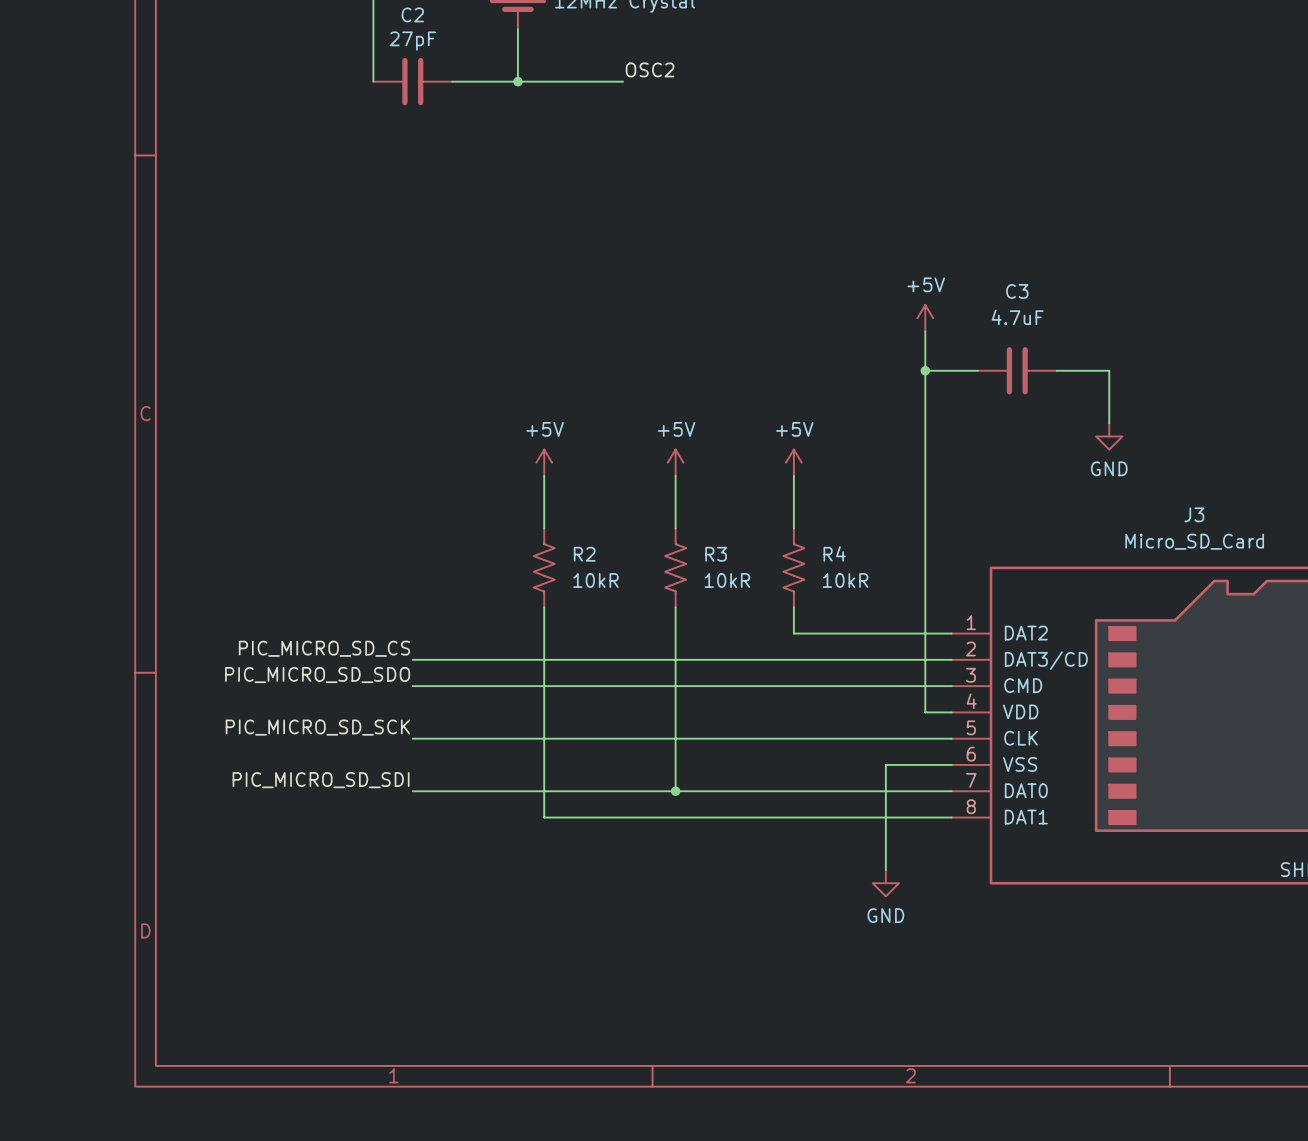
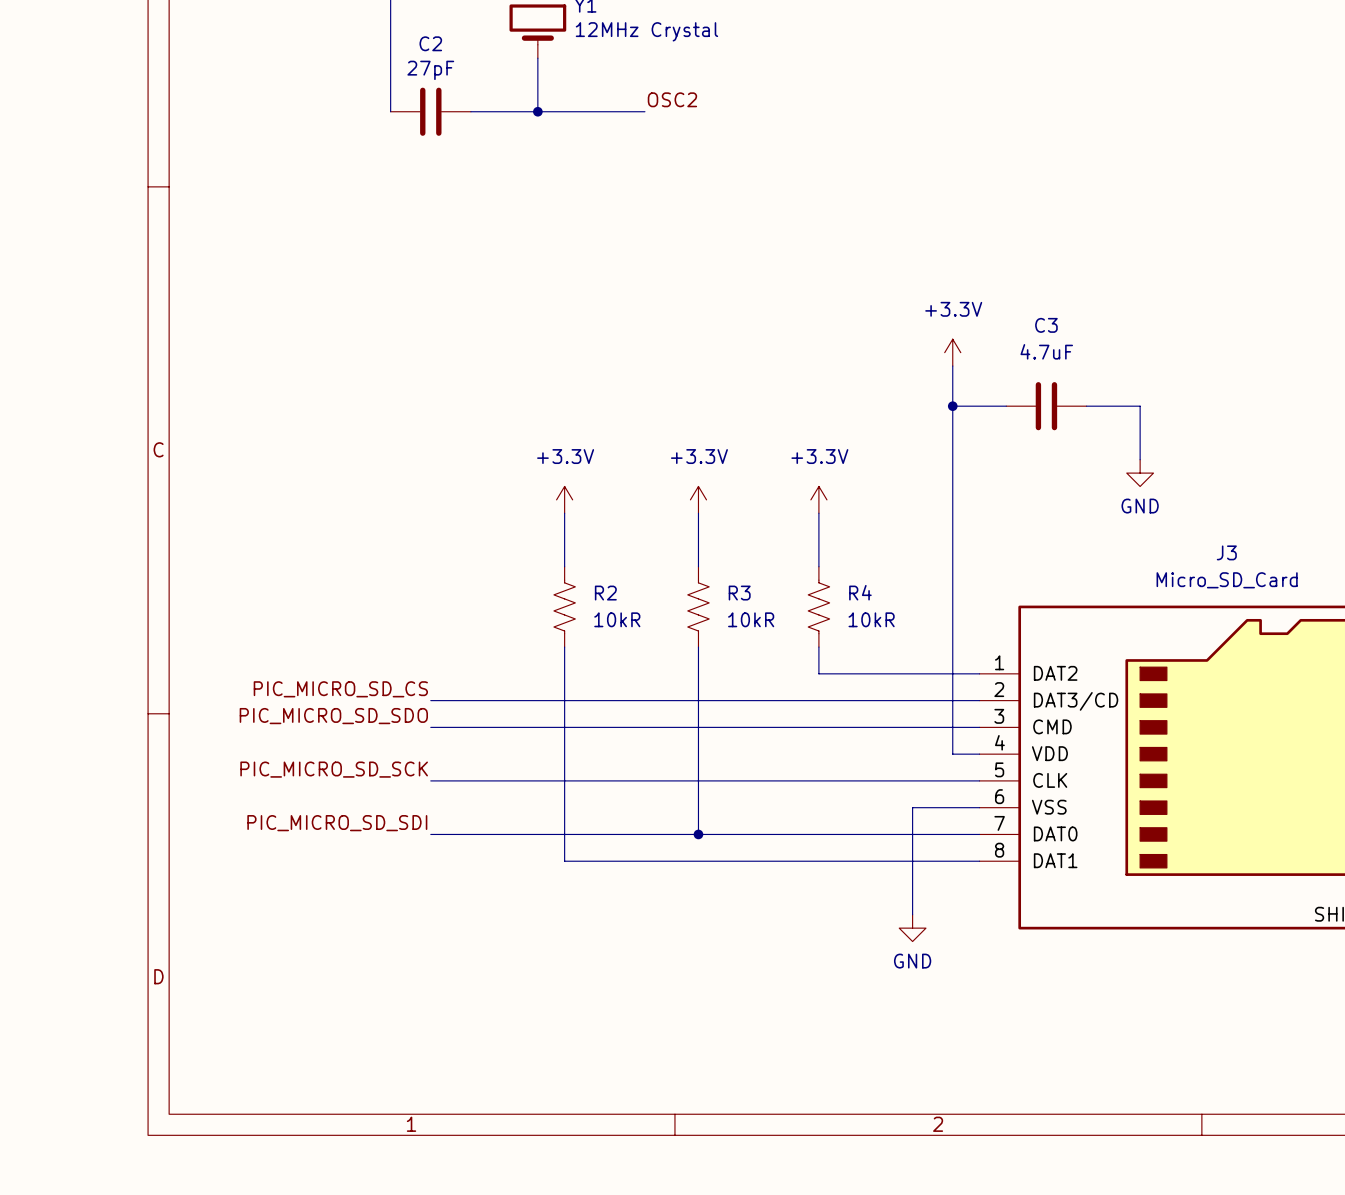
power symbol: +5V (925, 318) -> +3.3V (952, 352)
power symbol: +5V (544, 462) -> +3.3V (564, 499)
power symbol: +5V (675, 462) -> +3.3V (698, 499)
power symbol: +5V (793, 462) -> +3.3V (818, 499)

